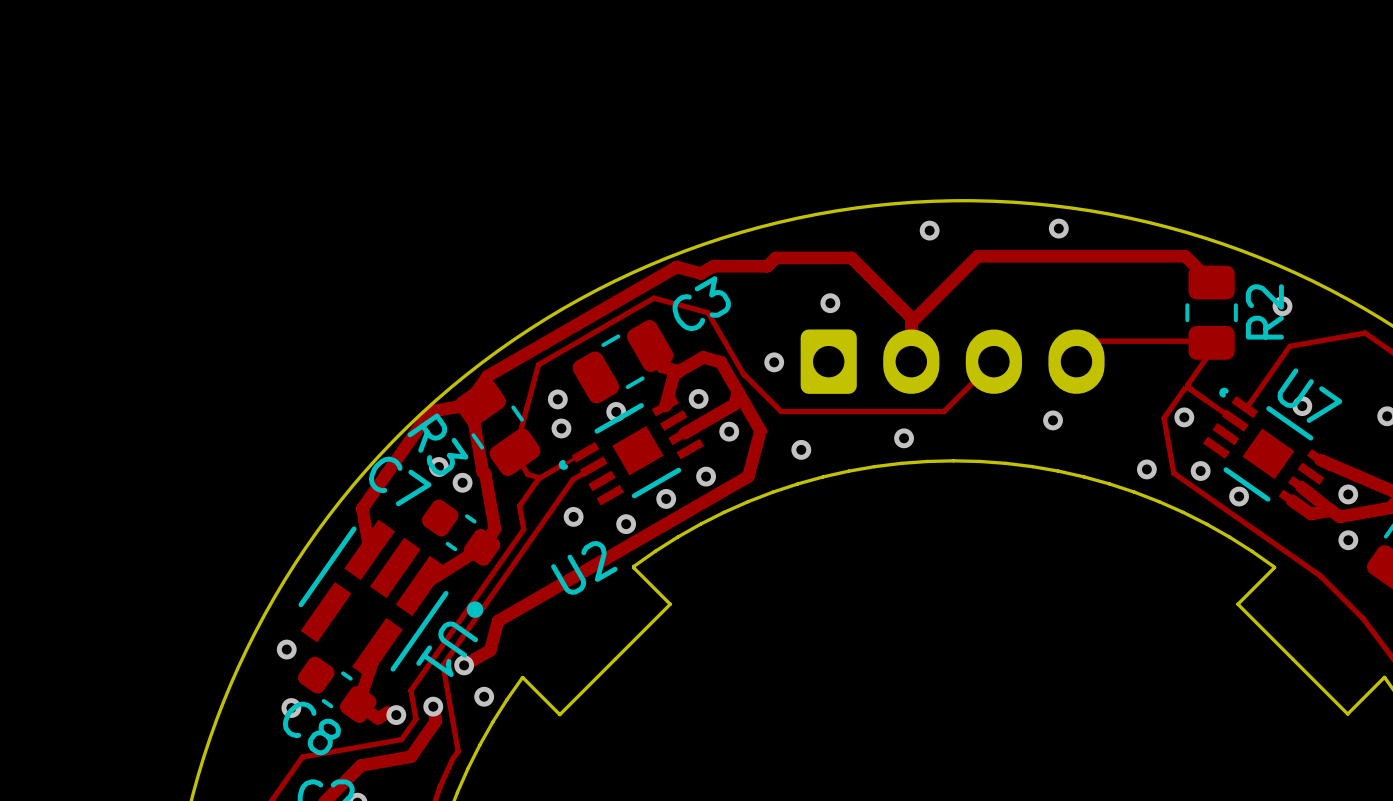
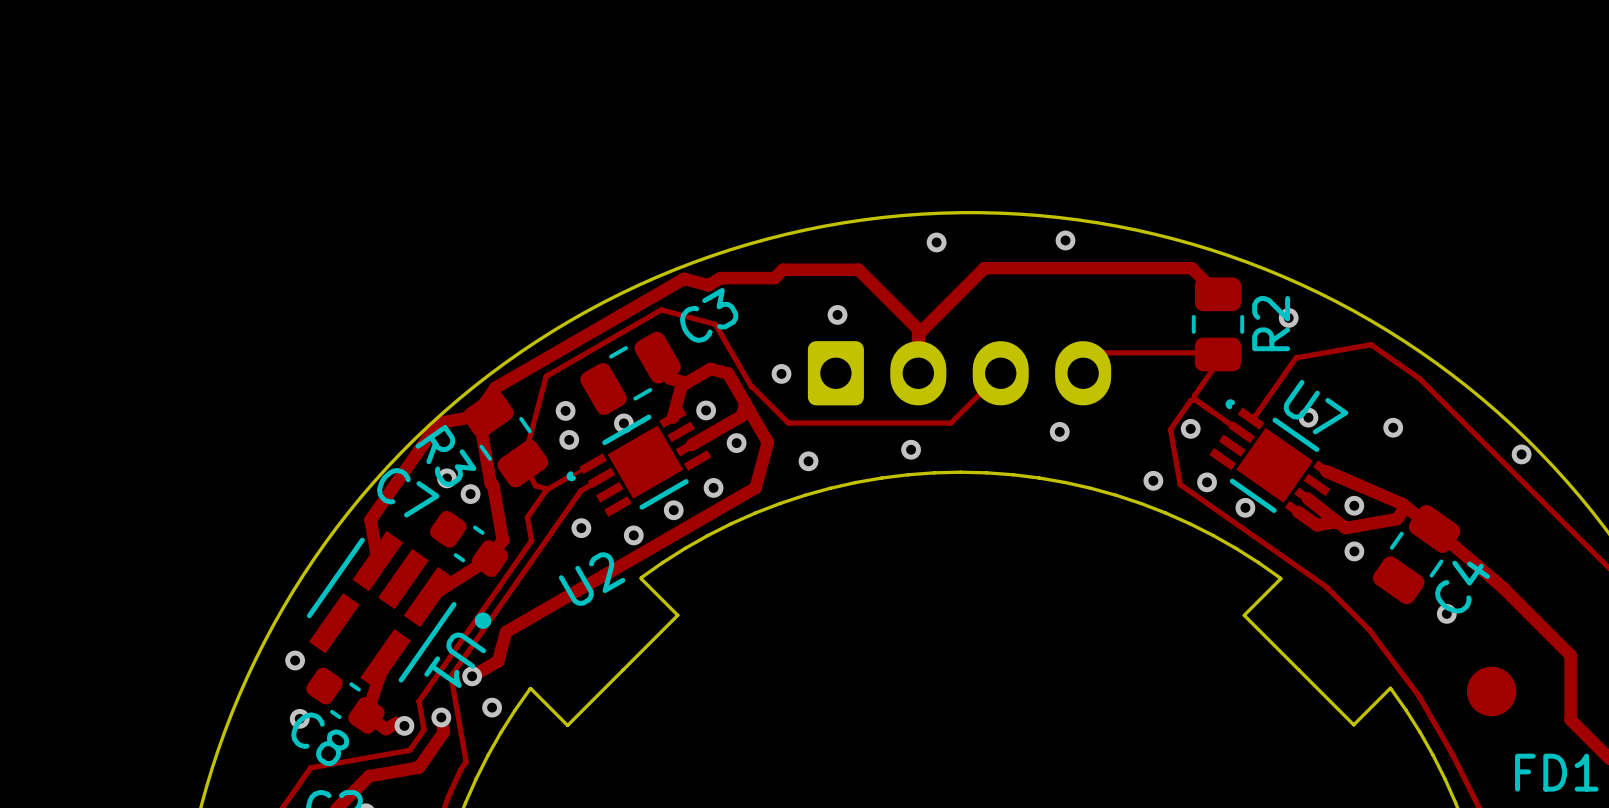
U7 footprint: [1202, 387, 1334, 512] -> [1209, 399, 1340, 524]
U2 footprint: [558, 395, 704, 506] -> [566, 407, 712, 517]

